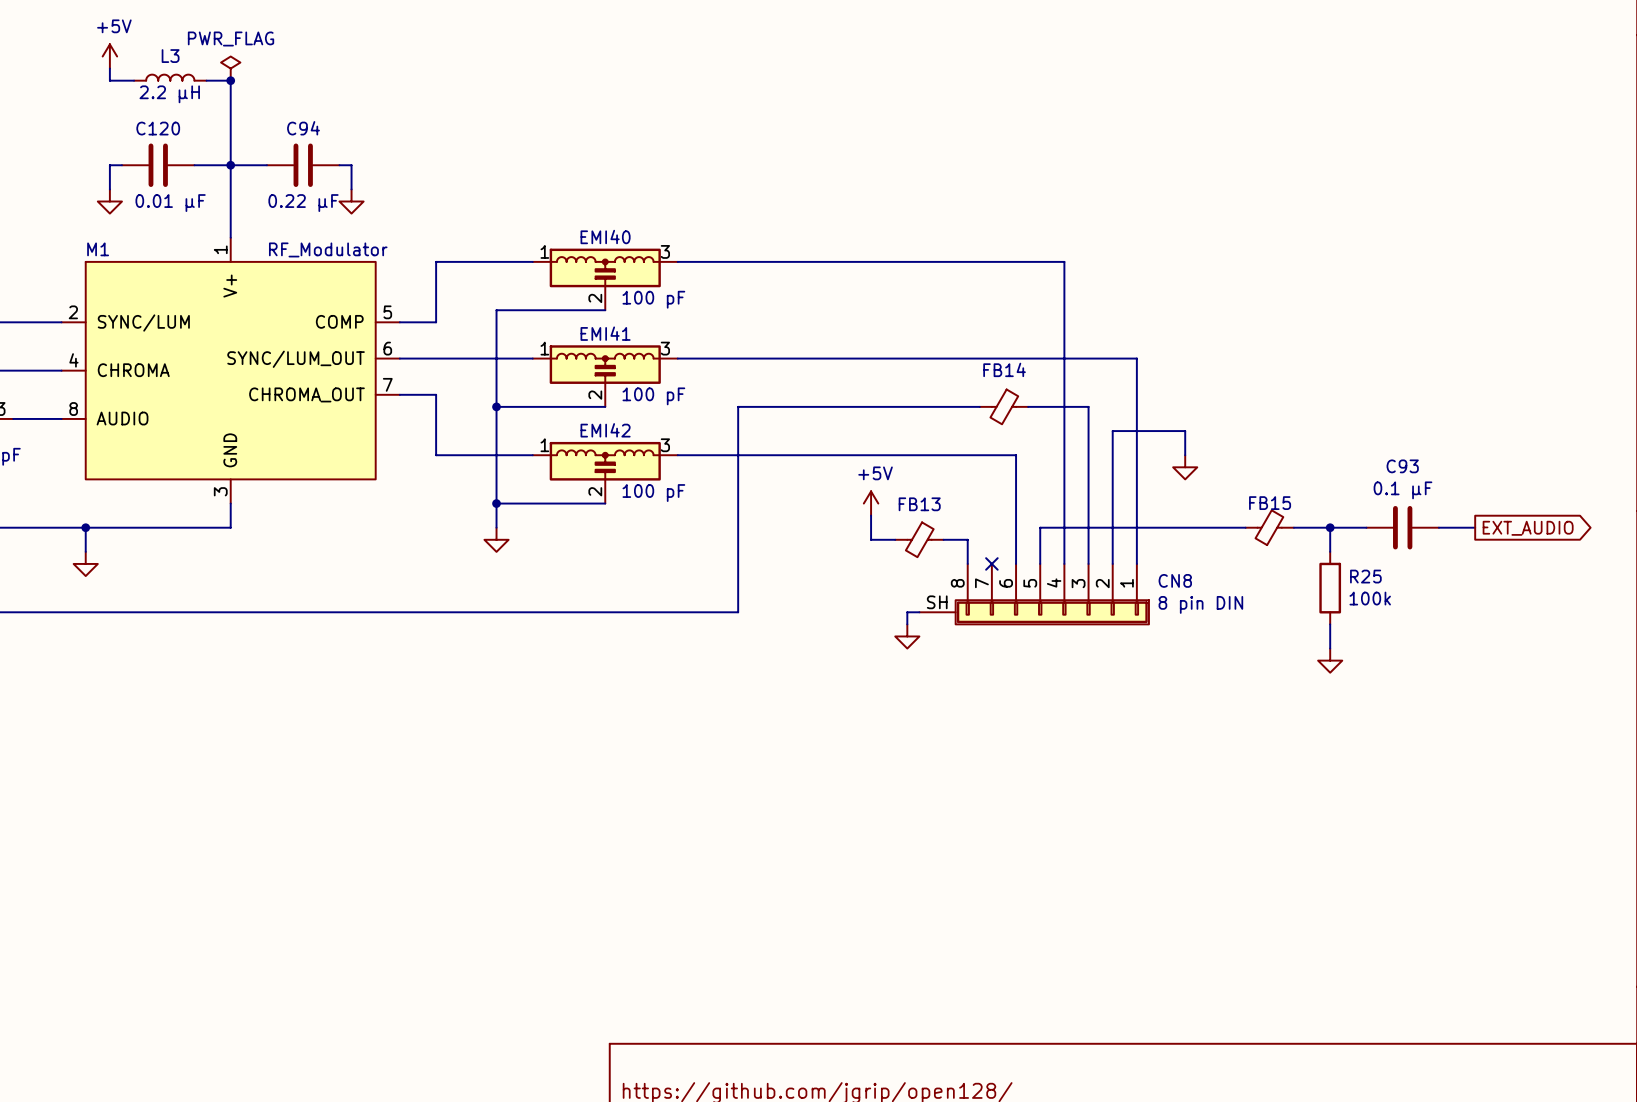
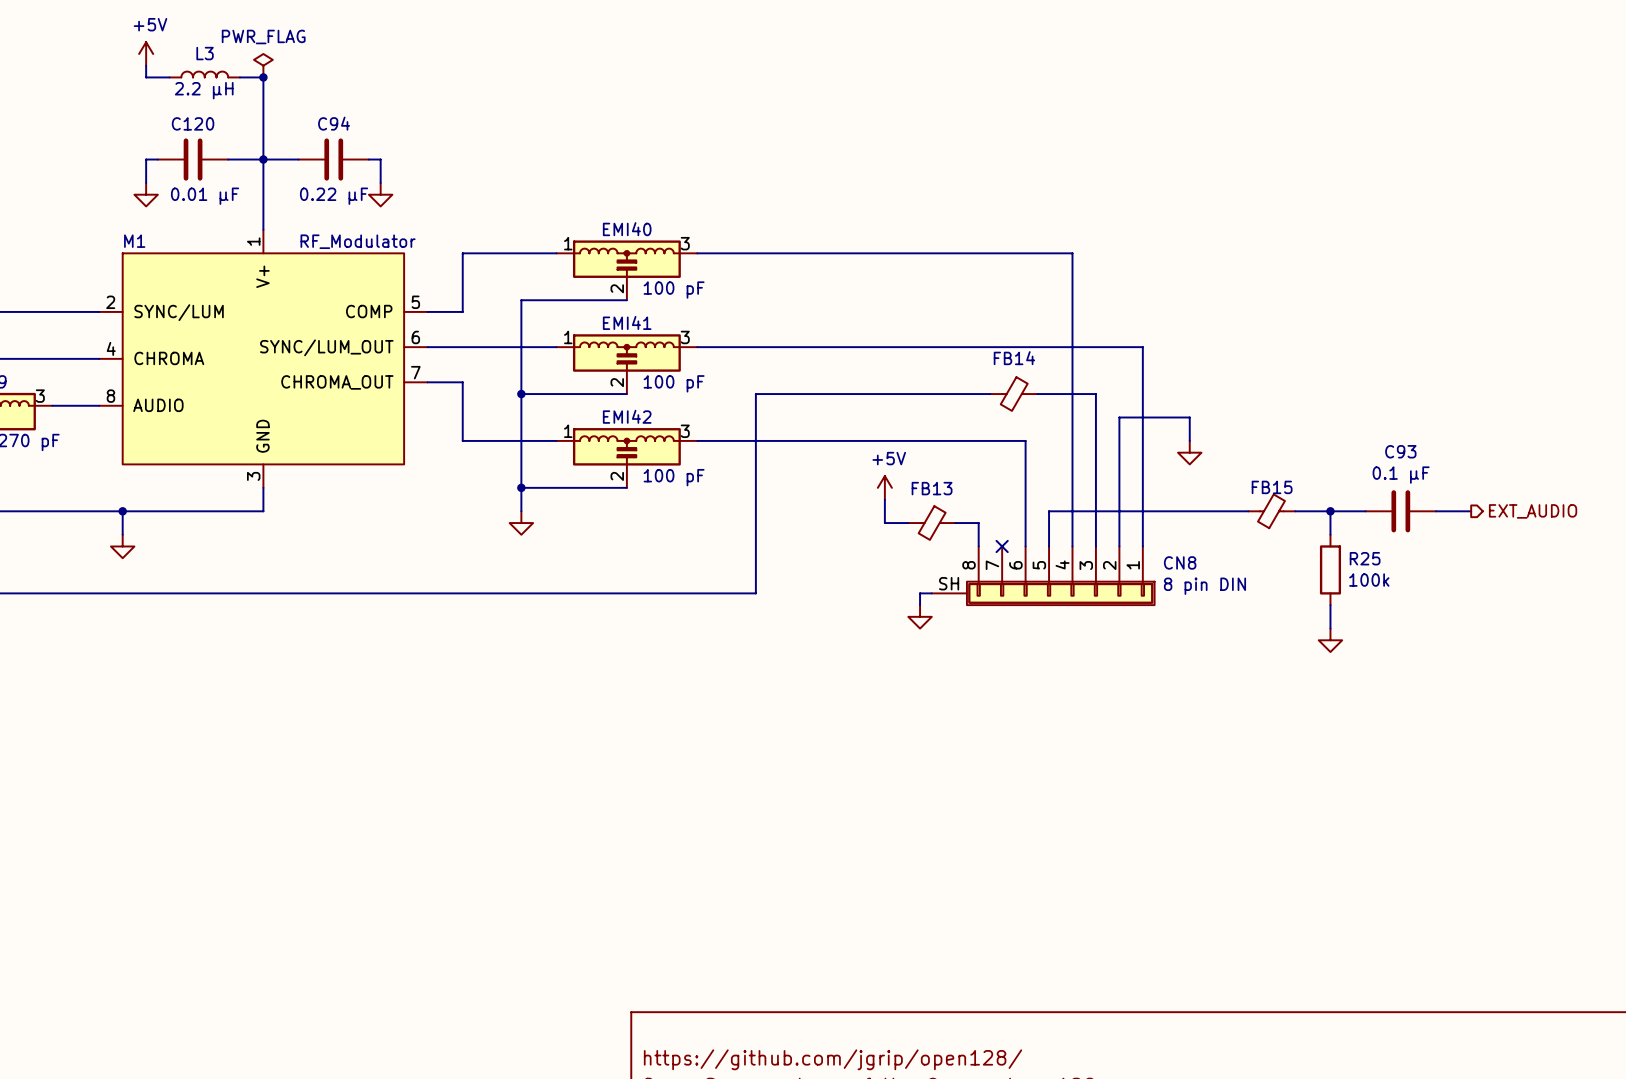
hierarchical label: none -> EXT_AUDIO (1533, 511)
global label: EXT_AUDIO (1528, 528) -> none

